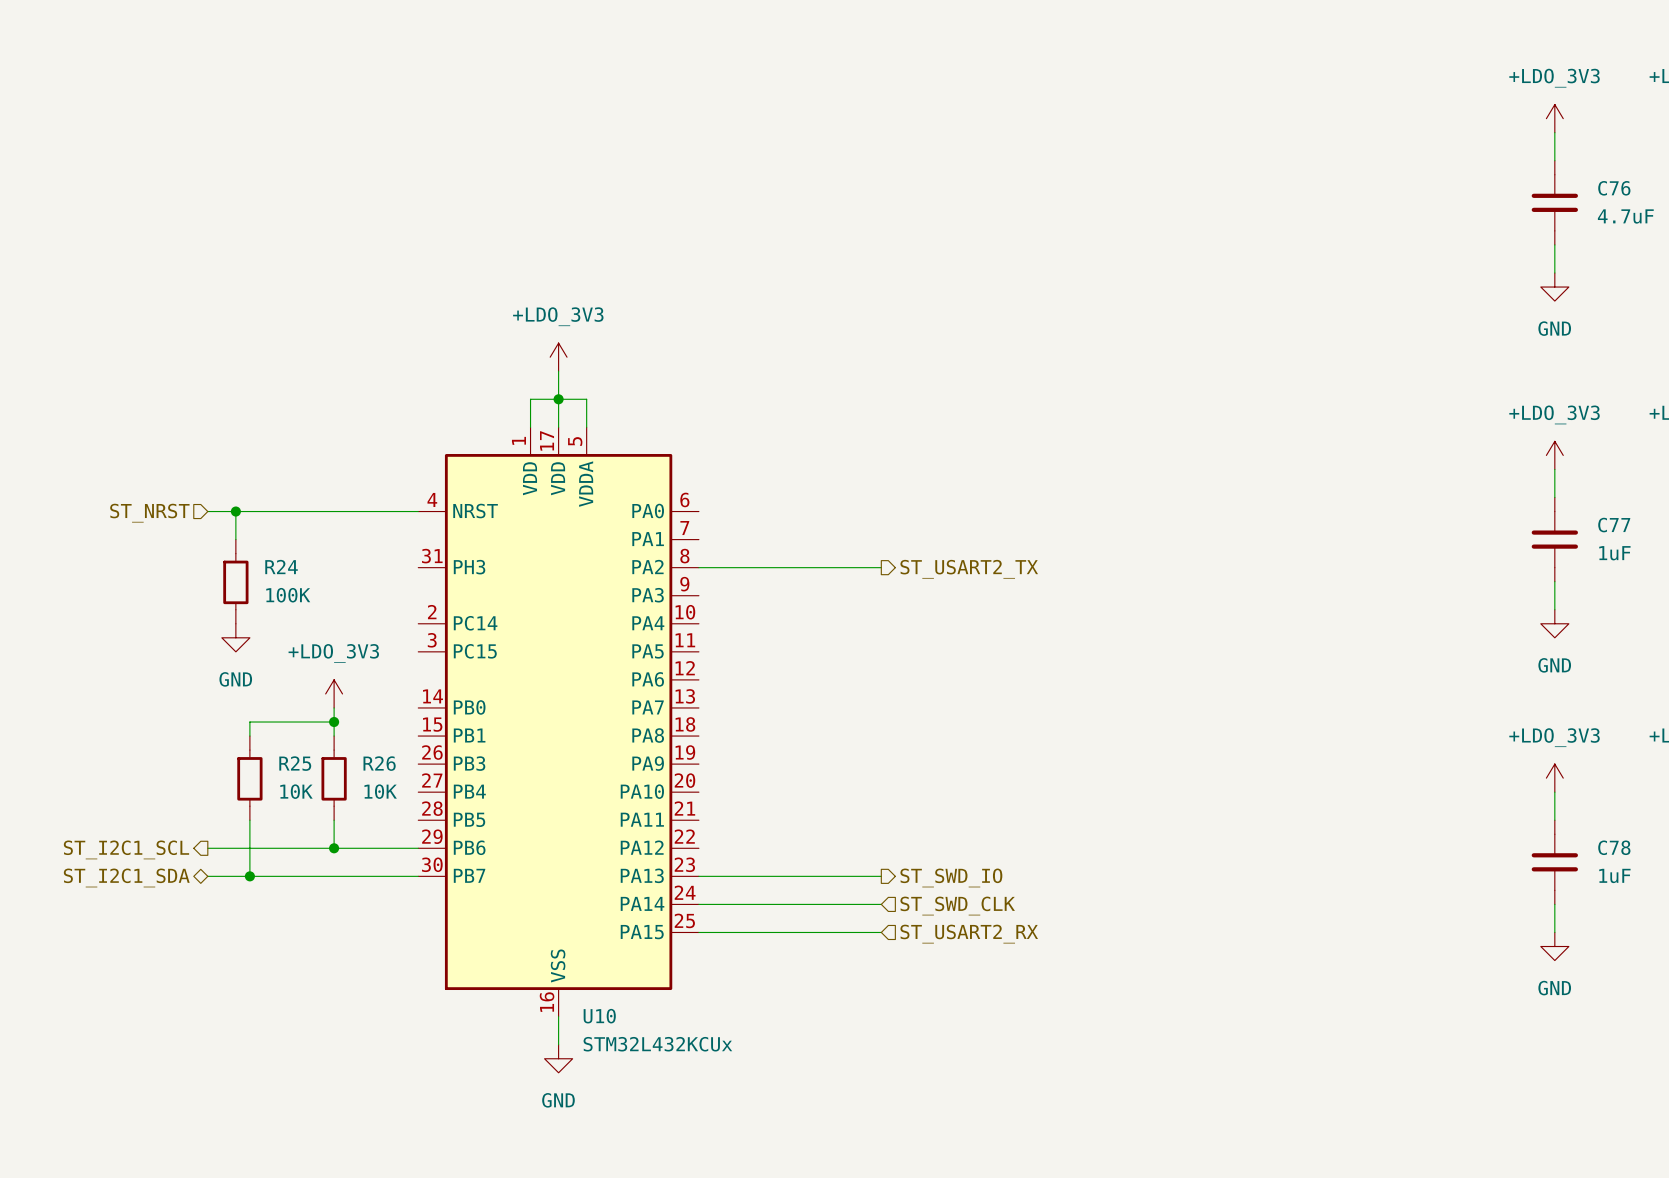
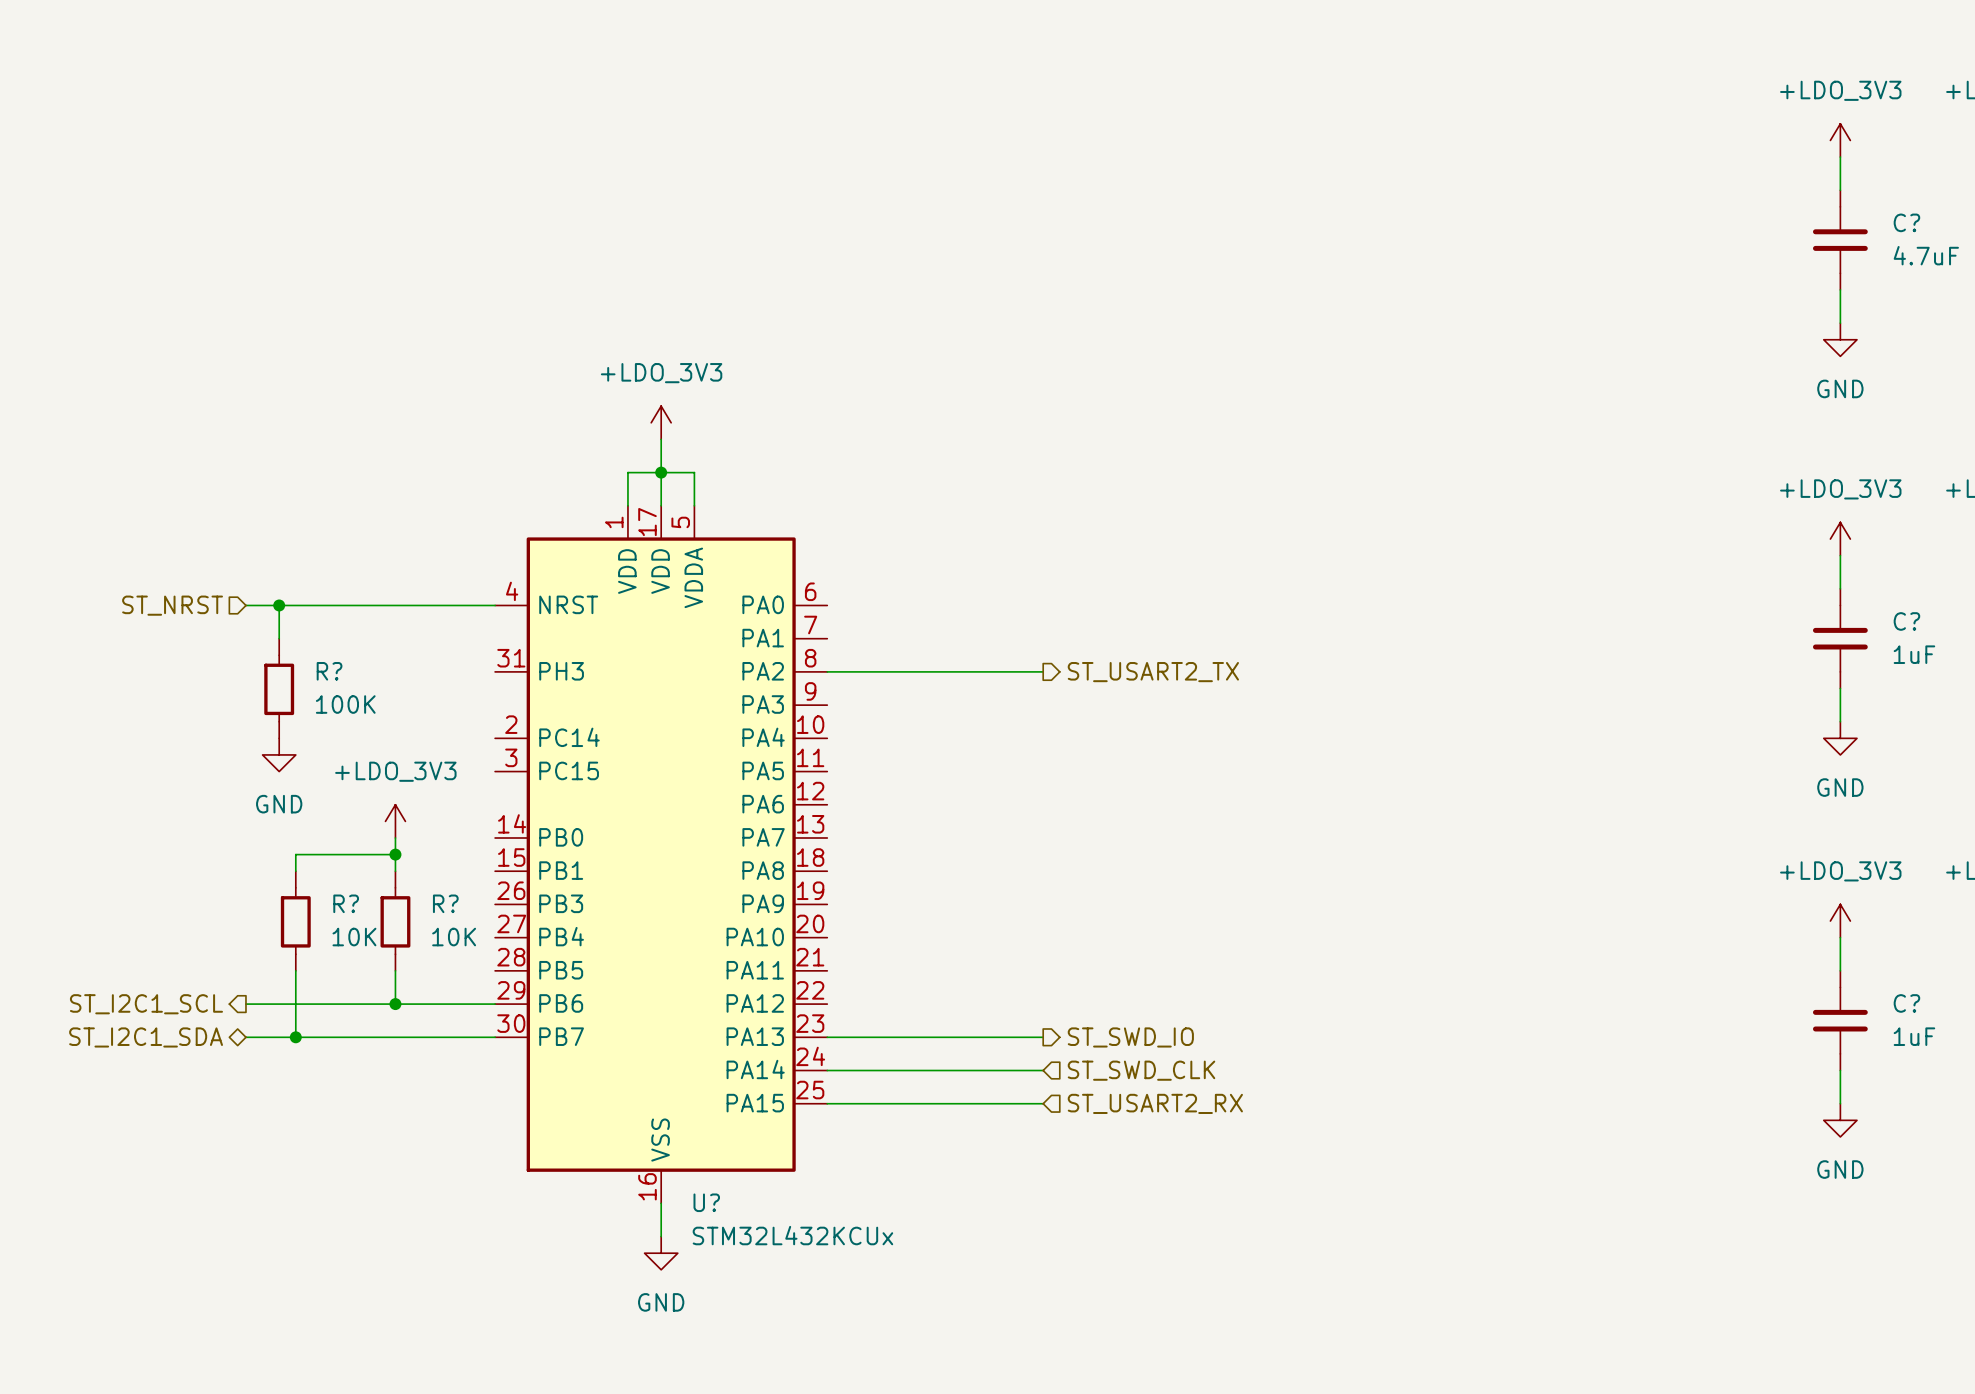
C76 name: C76 (1614, 188) -> C? (1906, 222)
C77 name: C77 (1614, 525) -> C? (1906, 621)
R24 name: R24 (281, 567) -> R? (329, 671)
R25 name: R25 (295, 763) -> R? (346, 903)
R26 name: R26 (379, 763) -> R? (445, 903)
C78 name: C78 (1614, 847) -> C? (1906, 1003)
U10 name: U10 (599, 1016) -> U? (706, 1202)

